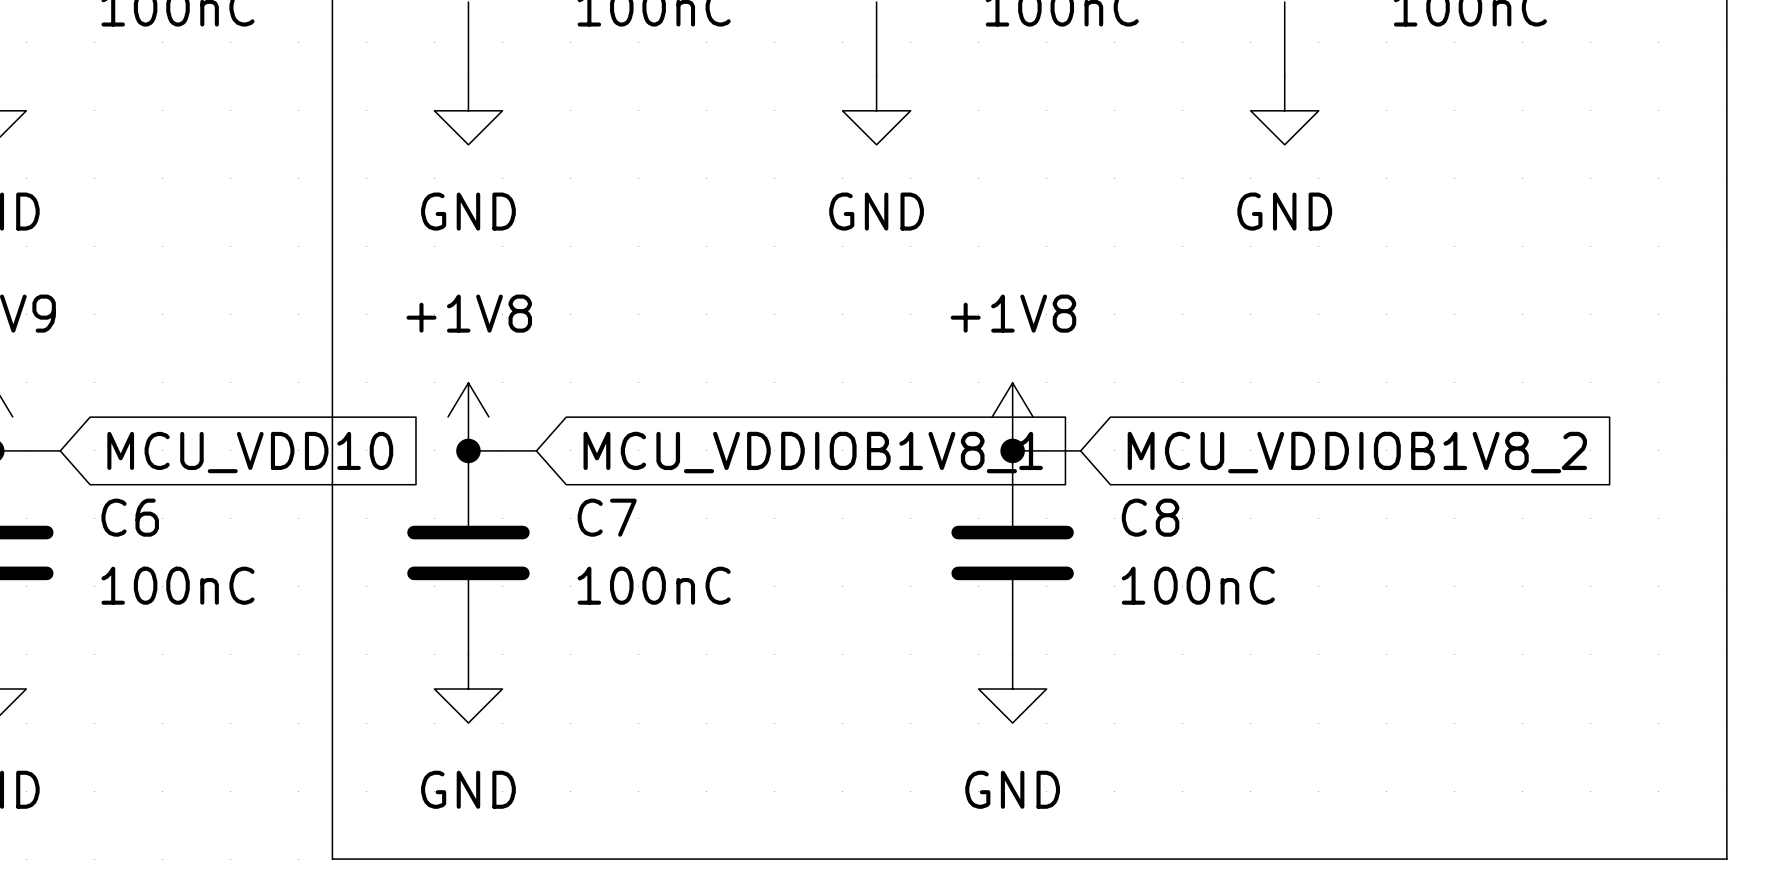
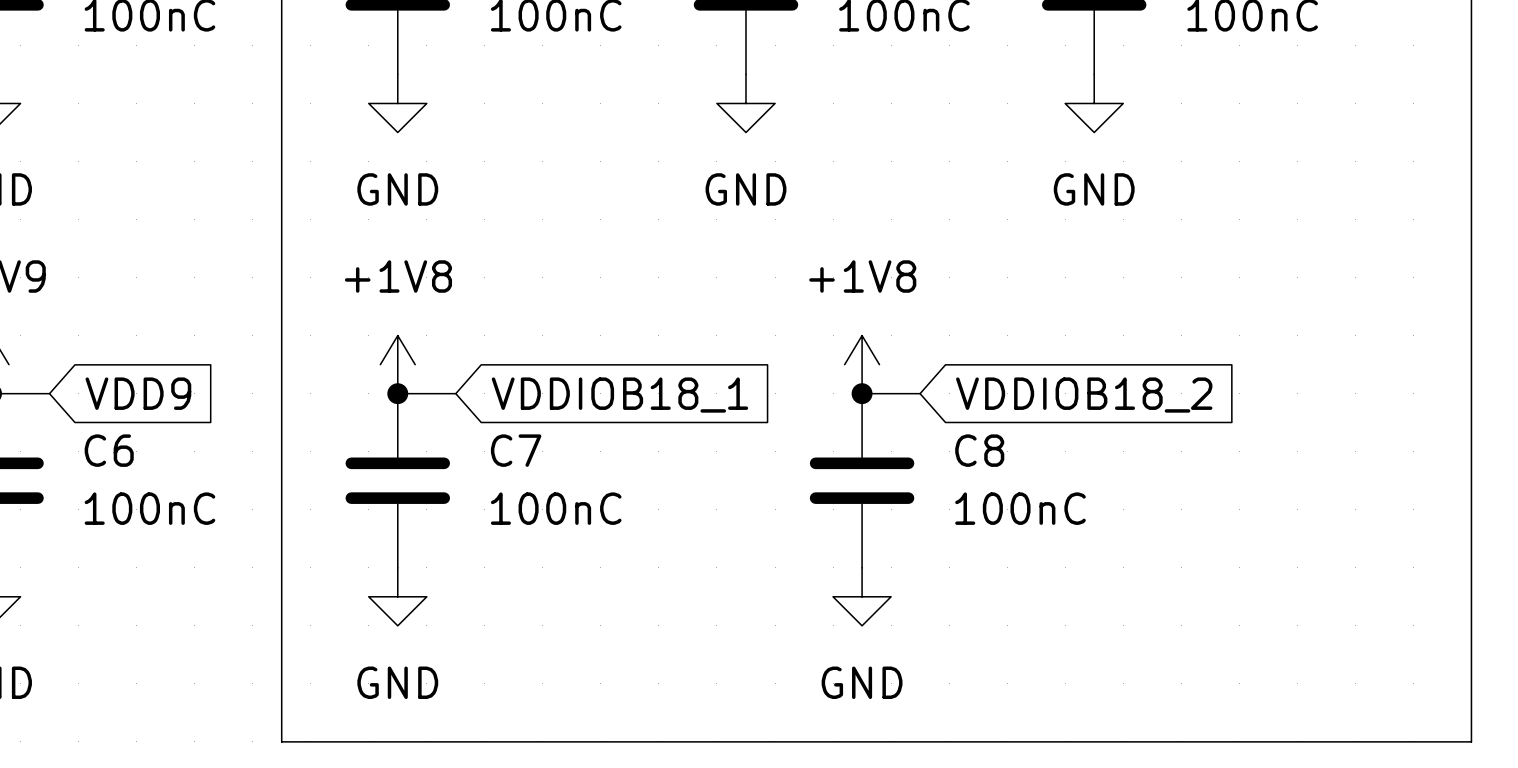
global label: MCU_VDD10 (250, 452) -> VDD9 (138, 393)
global label: MCU_VDDIOB1V8_1 (813, 452) -> VDDIOB18_1 (619, 395)
global label: MCU_VDDIOB1V8_2 (1357, 452) -> VDDIOB18_2 (1084, 395)

